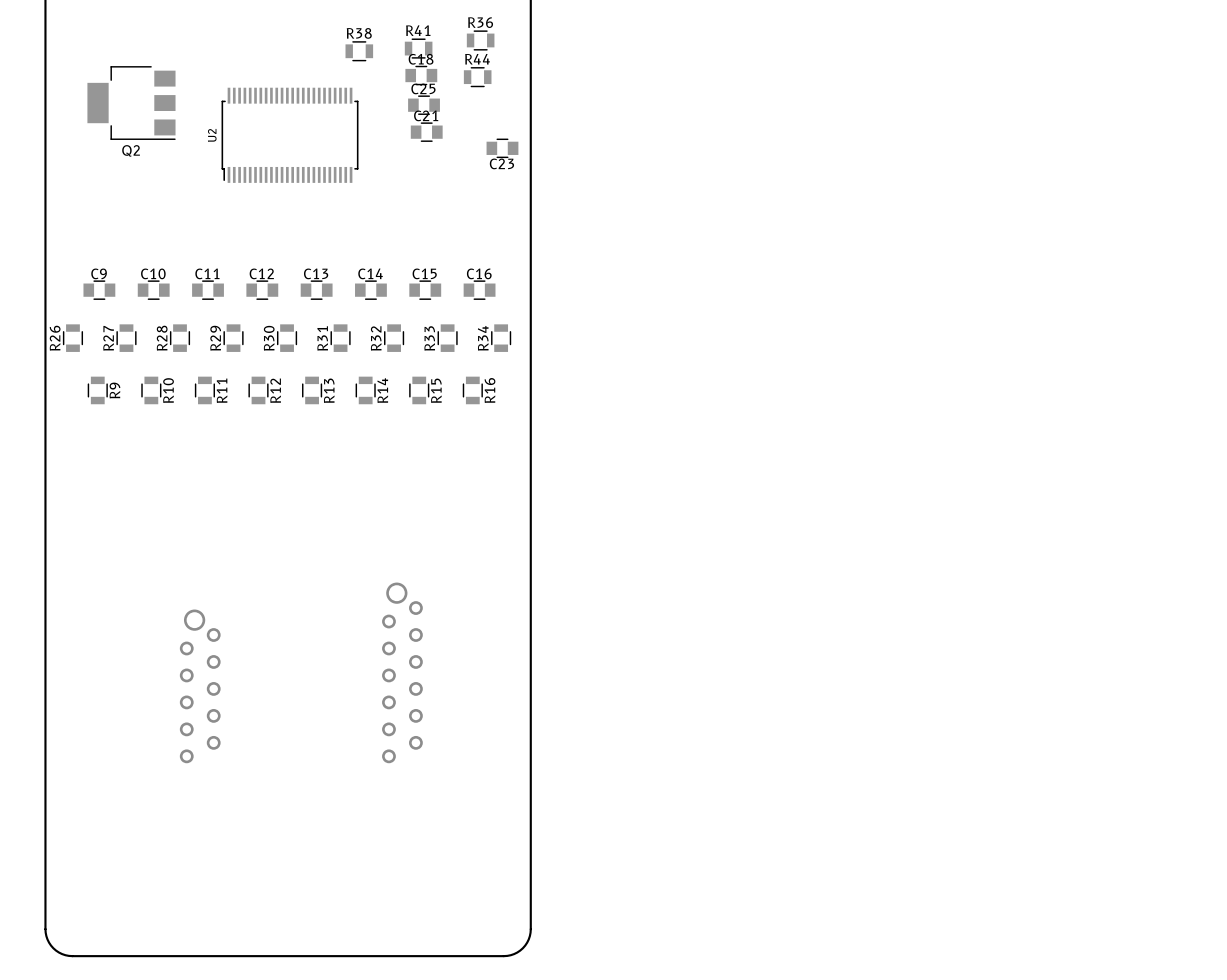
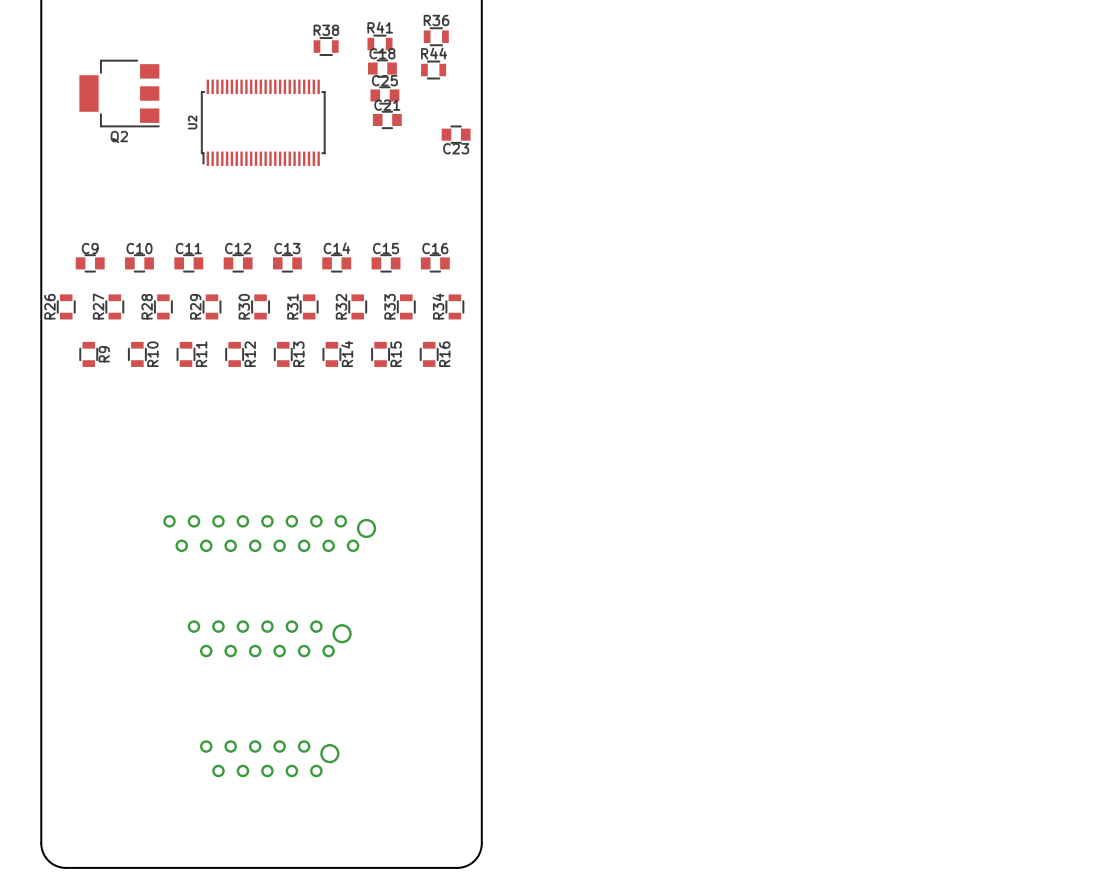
part: none -> (269, 533)
part rotation: 0° (402, 672) -> 90° clockwise (269, 638)
part position: (402, 672) -> (269, 638)
part rotation: 0° (200, 686) -> 90° clockwise (269, 758)
part position: (200, 686) -> (269, 758)

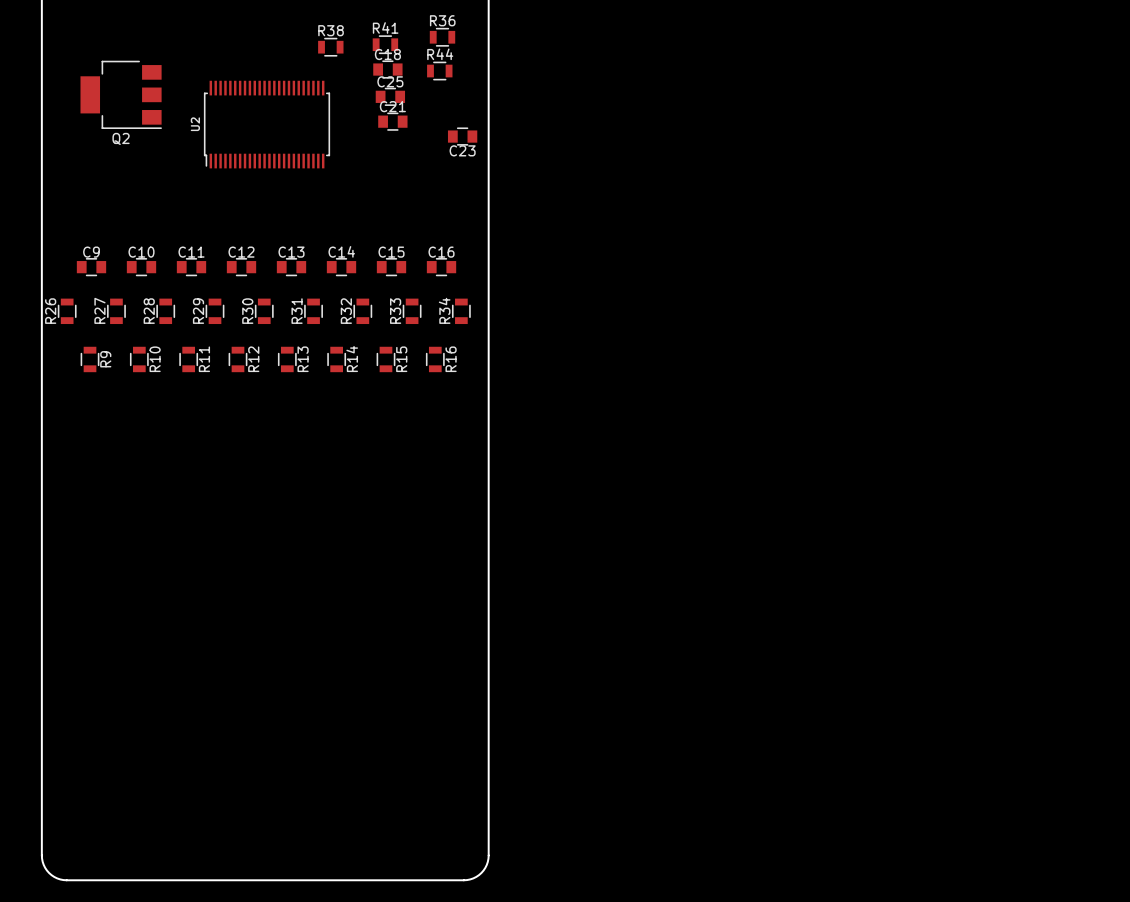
part: (269, 533) -> none
part: (269, 638) -> none
part: (269, 758) -> none

